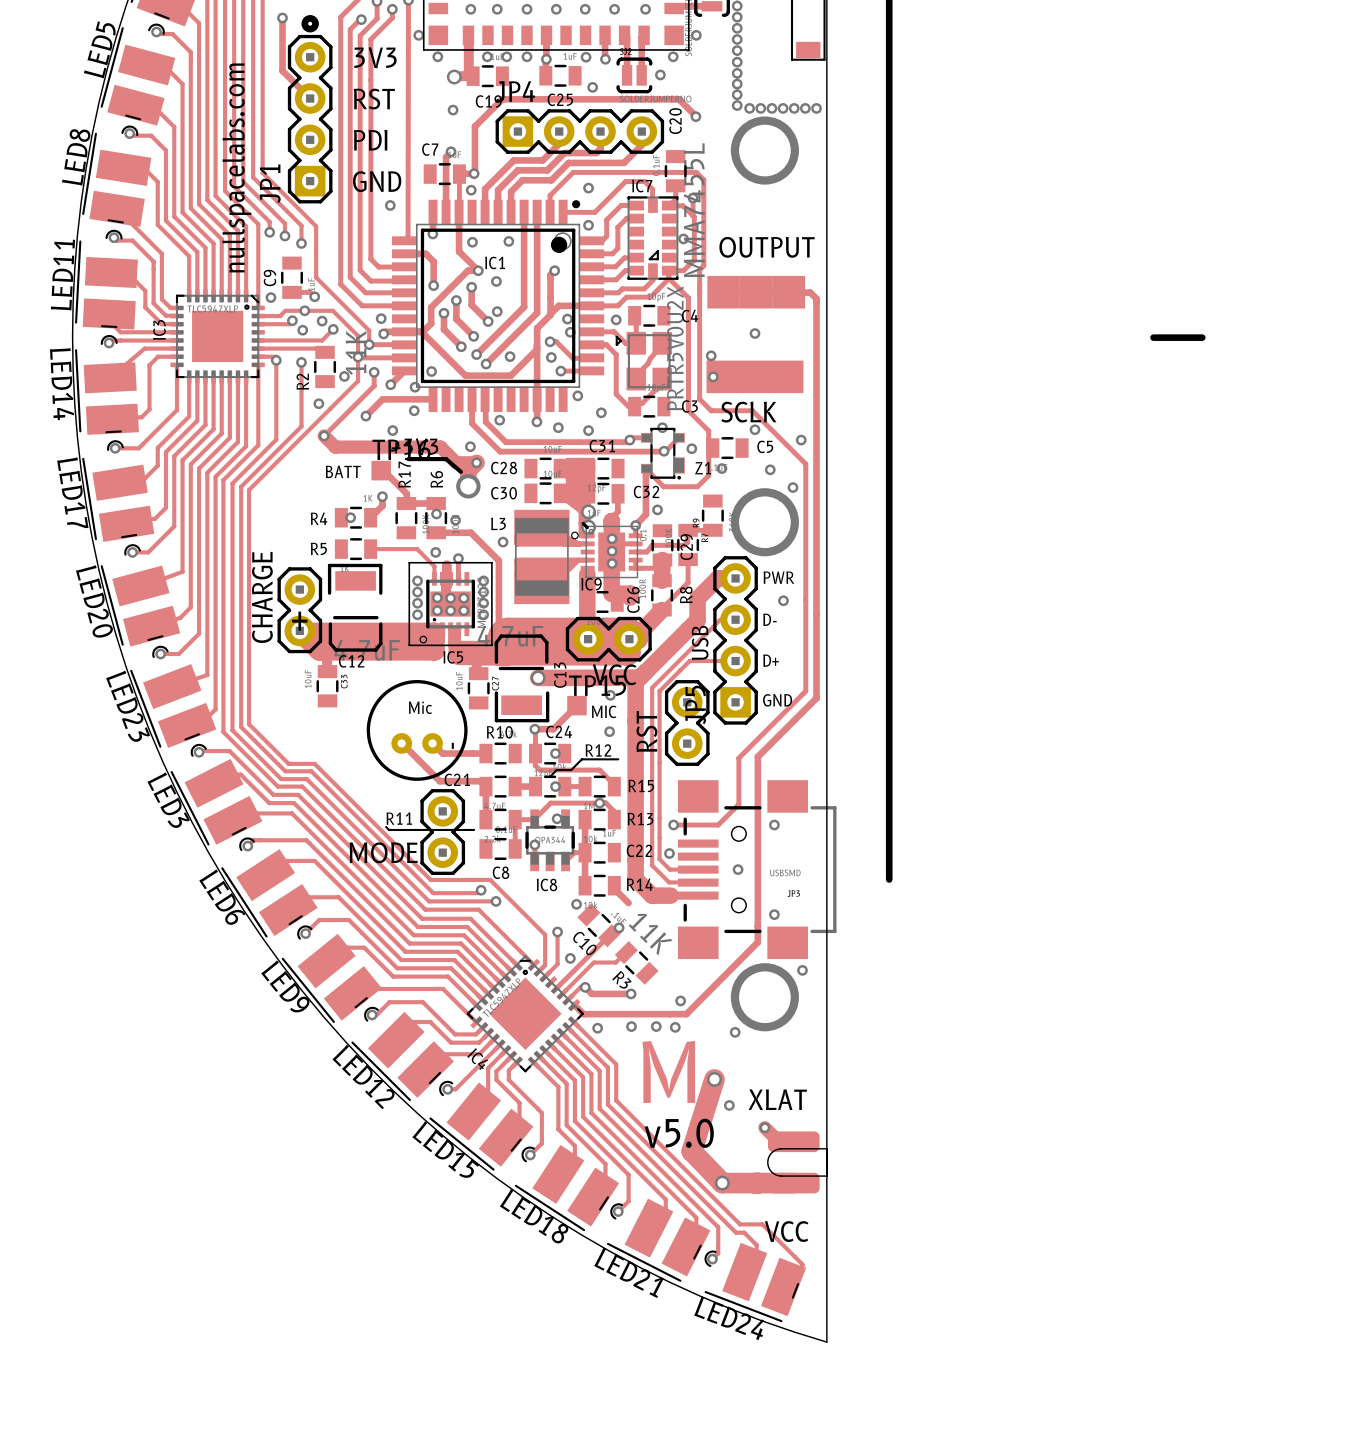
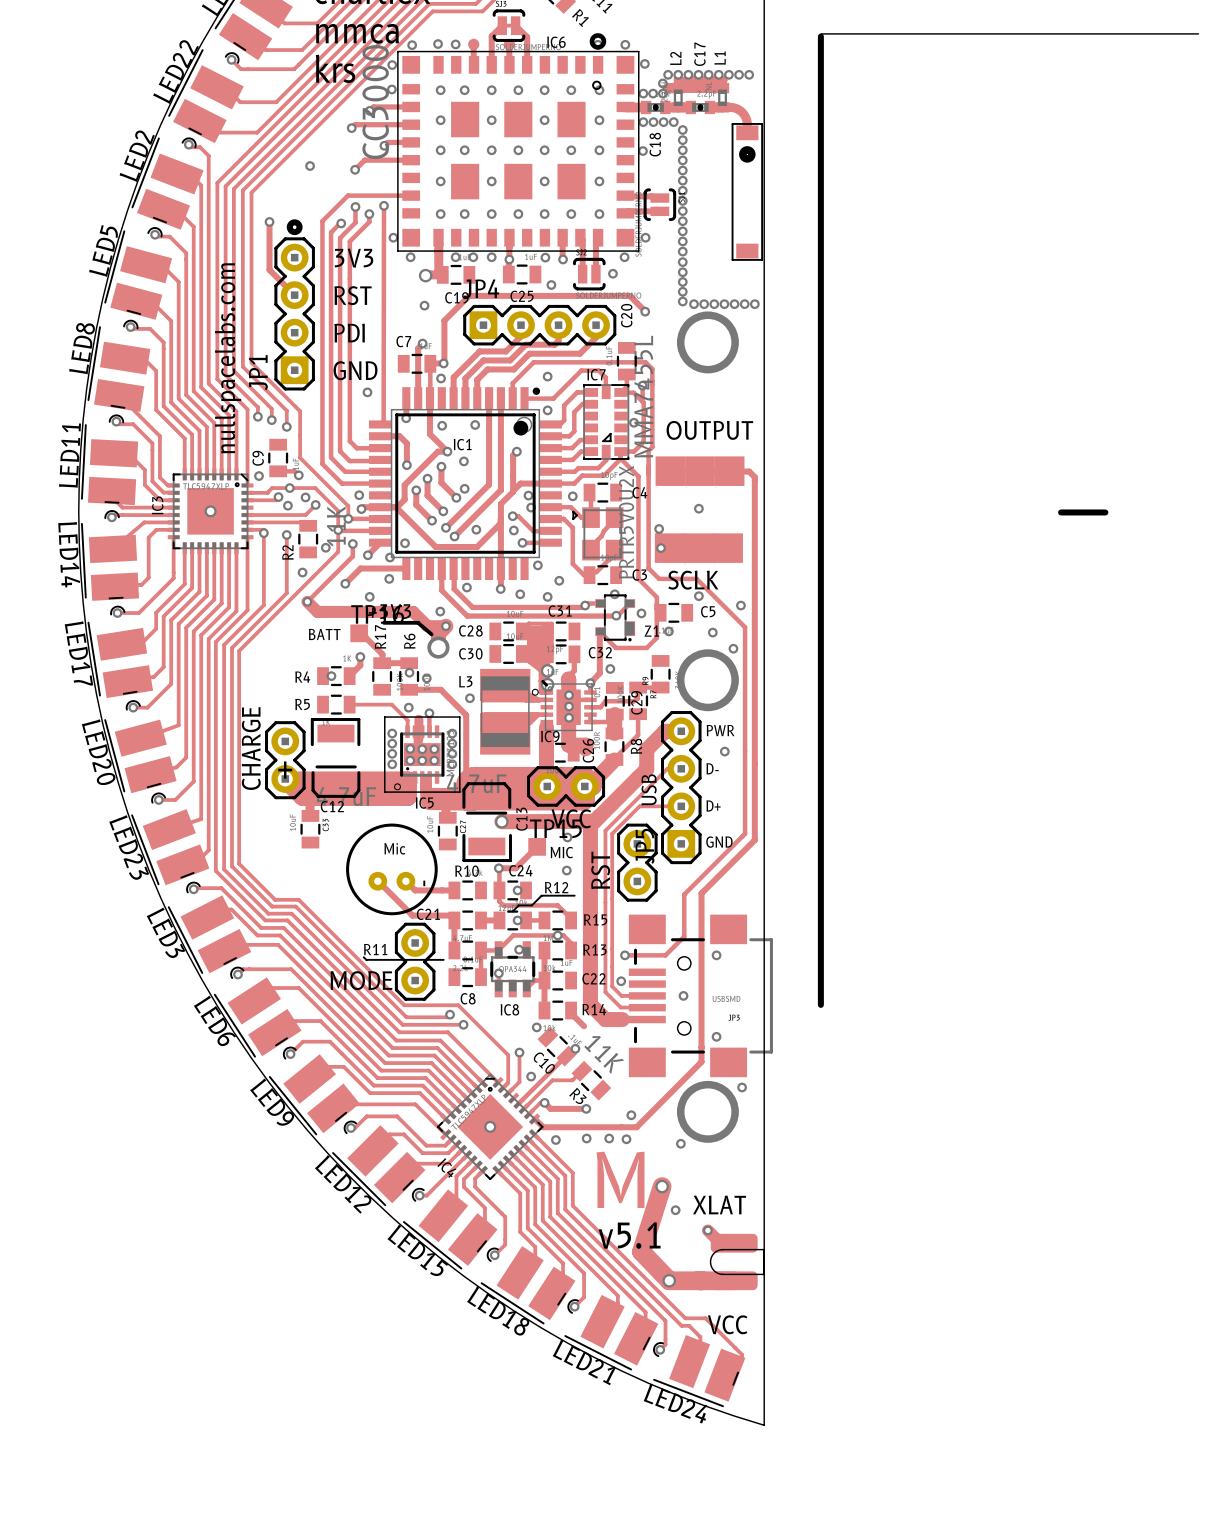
via: none -> (210, 511)
via: none -> (490, 1126)
text: v5.0 (679, 1133) -> v5.1 (629, 1235)

